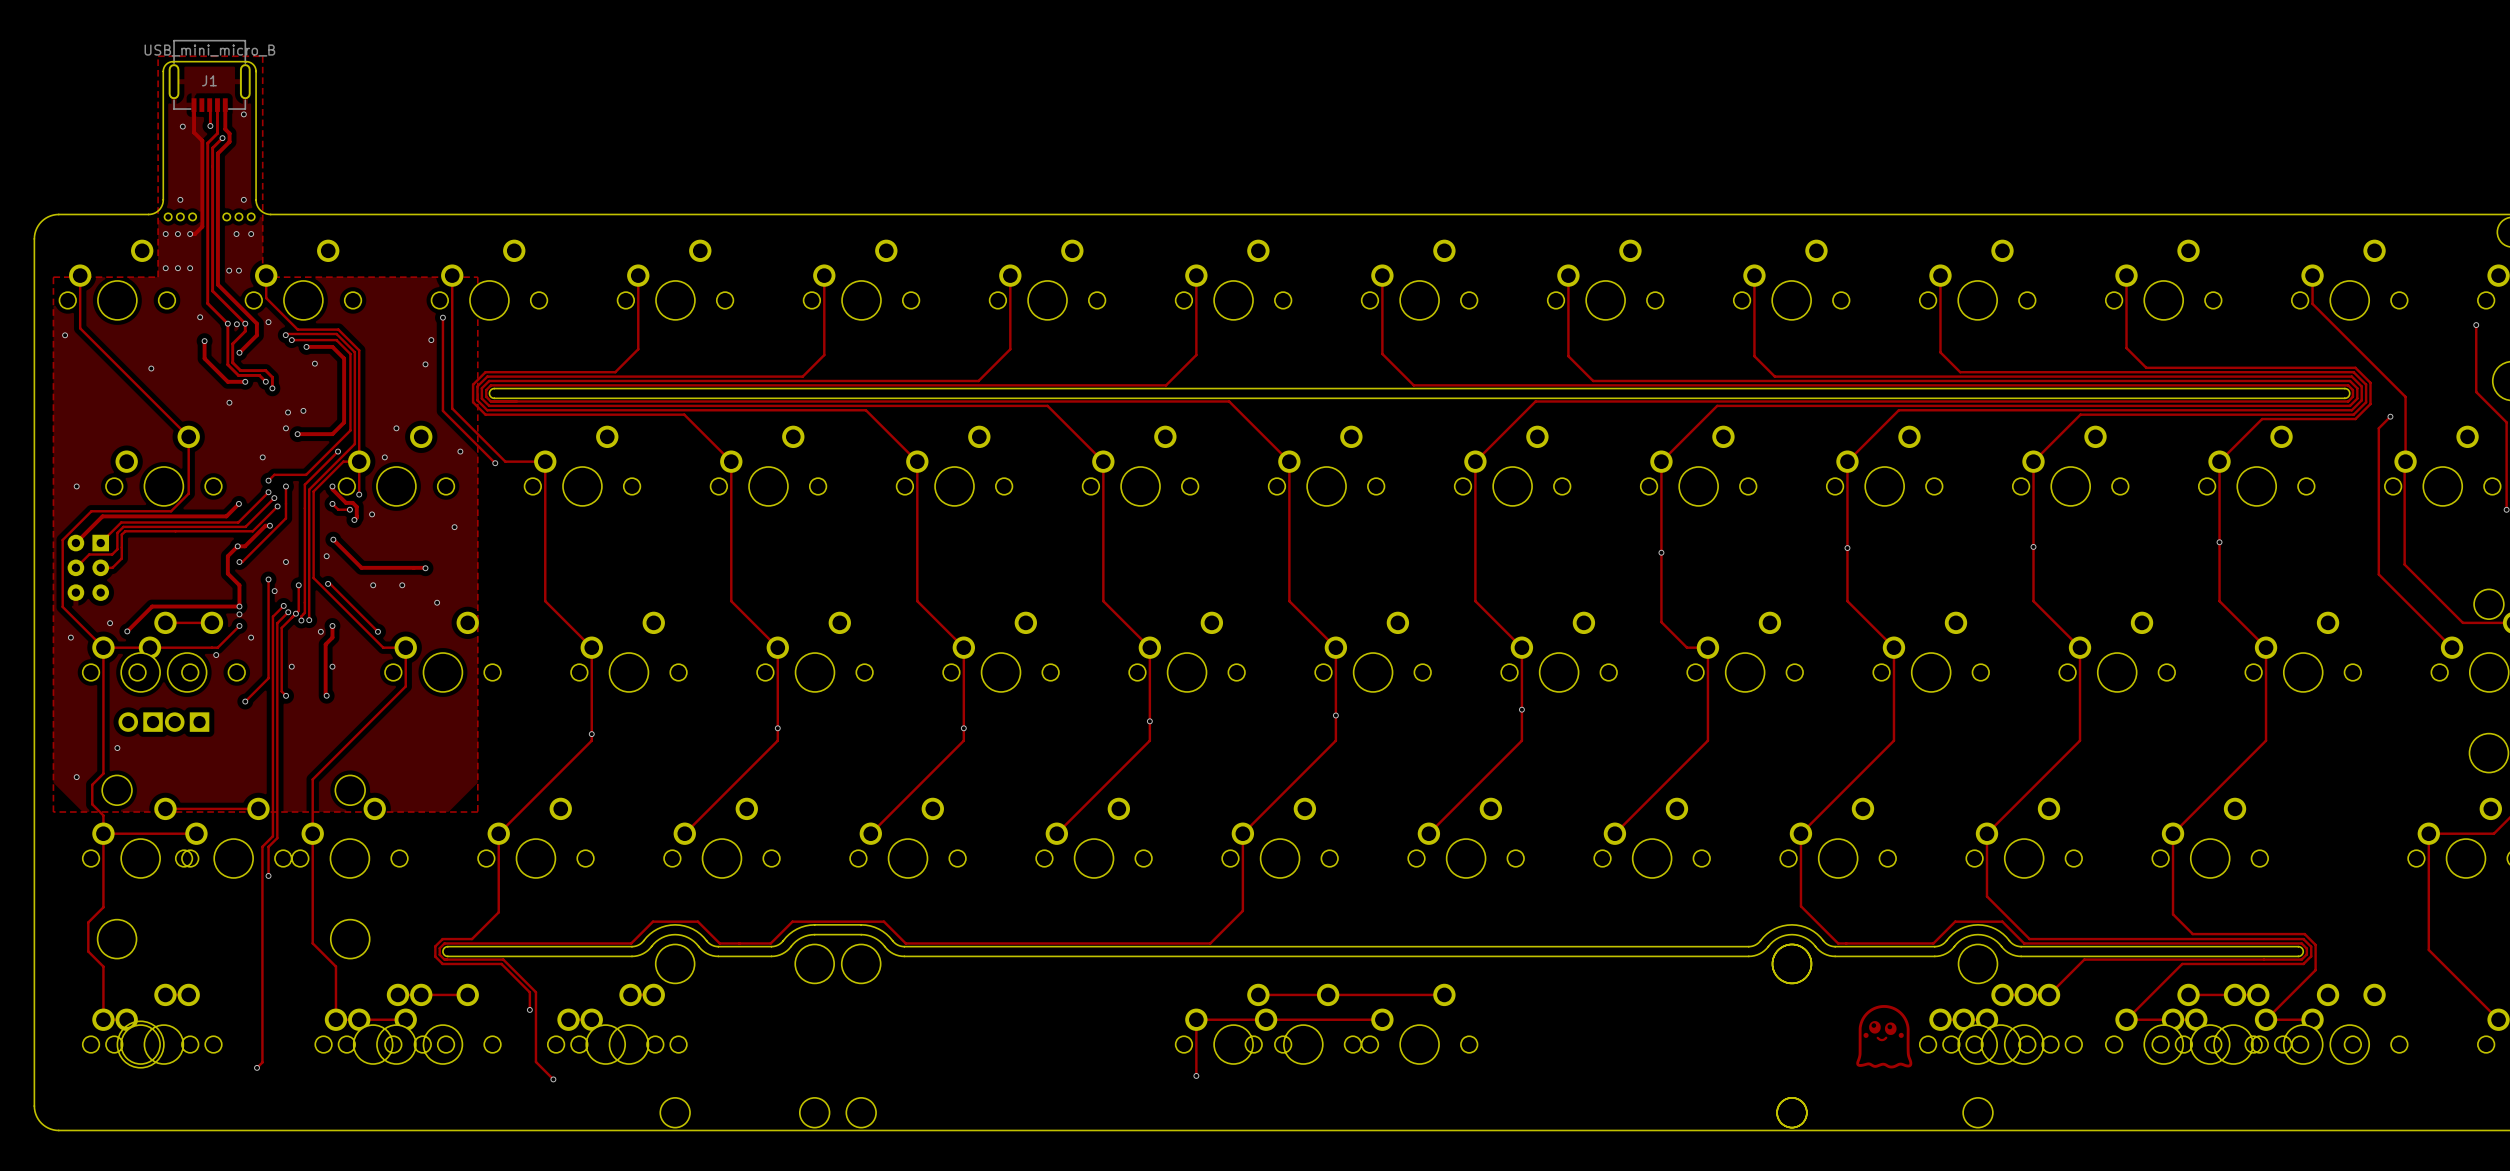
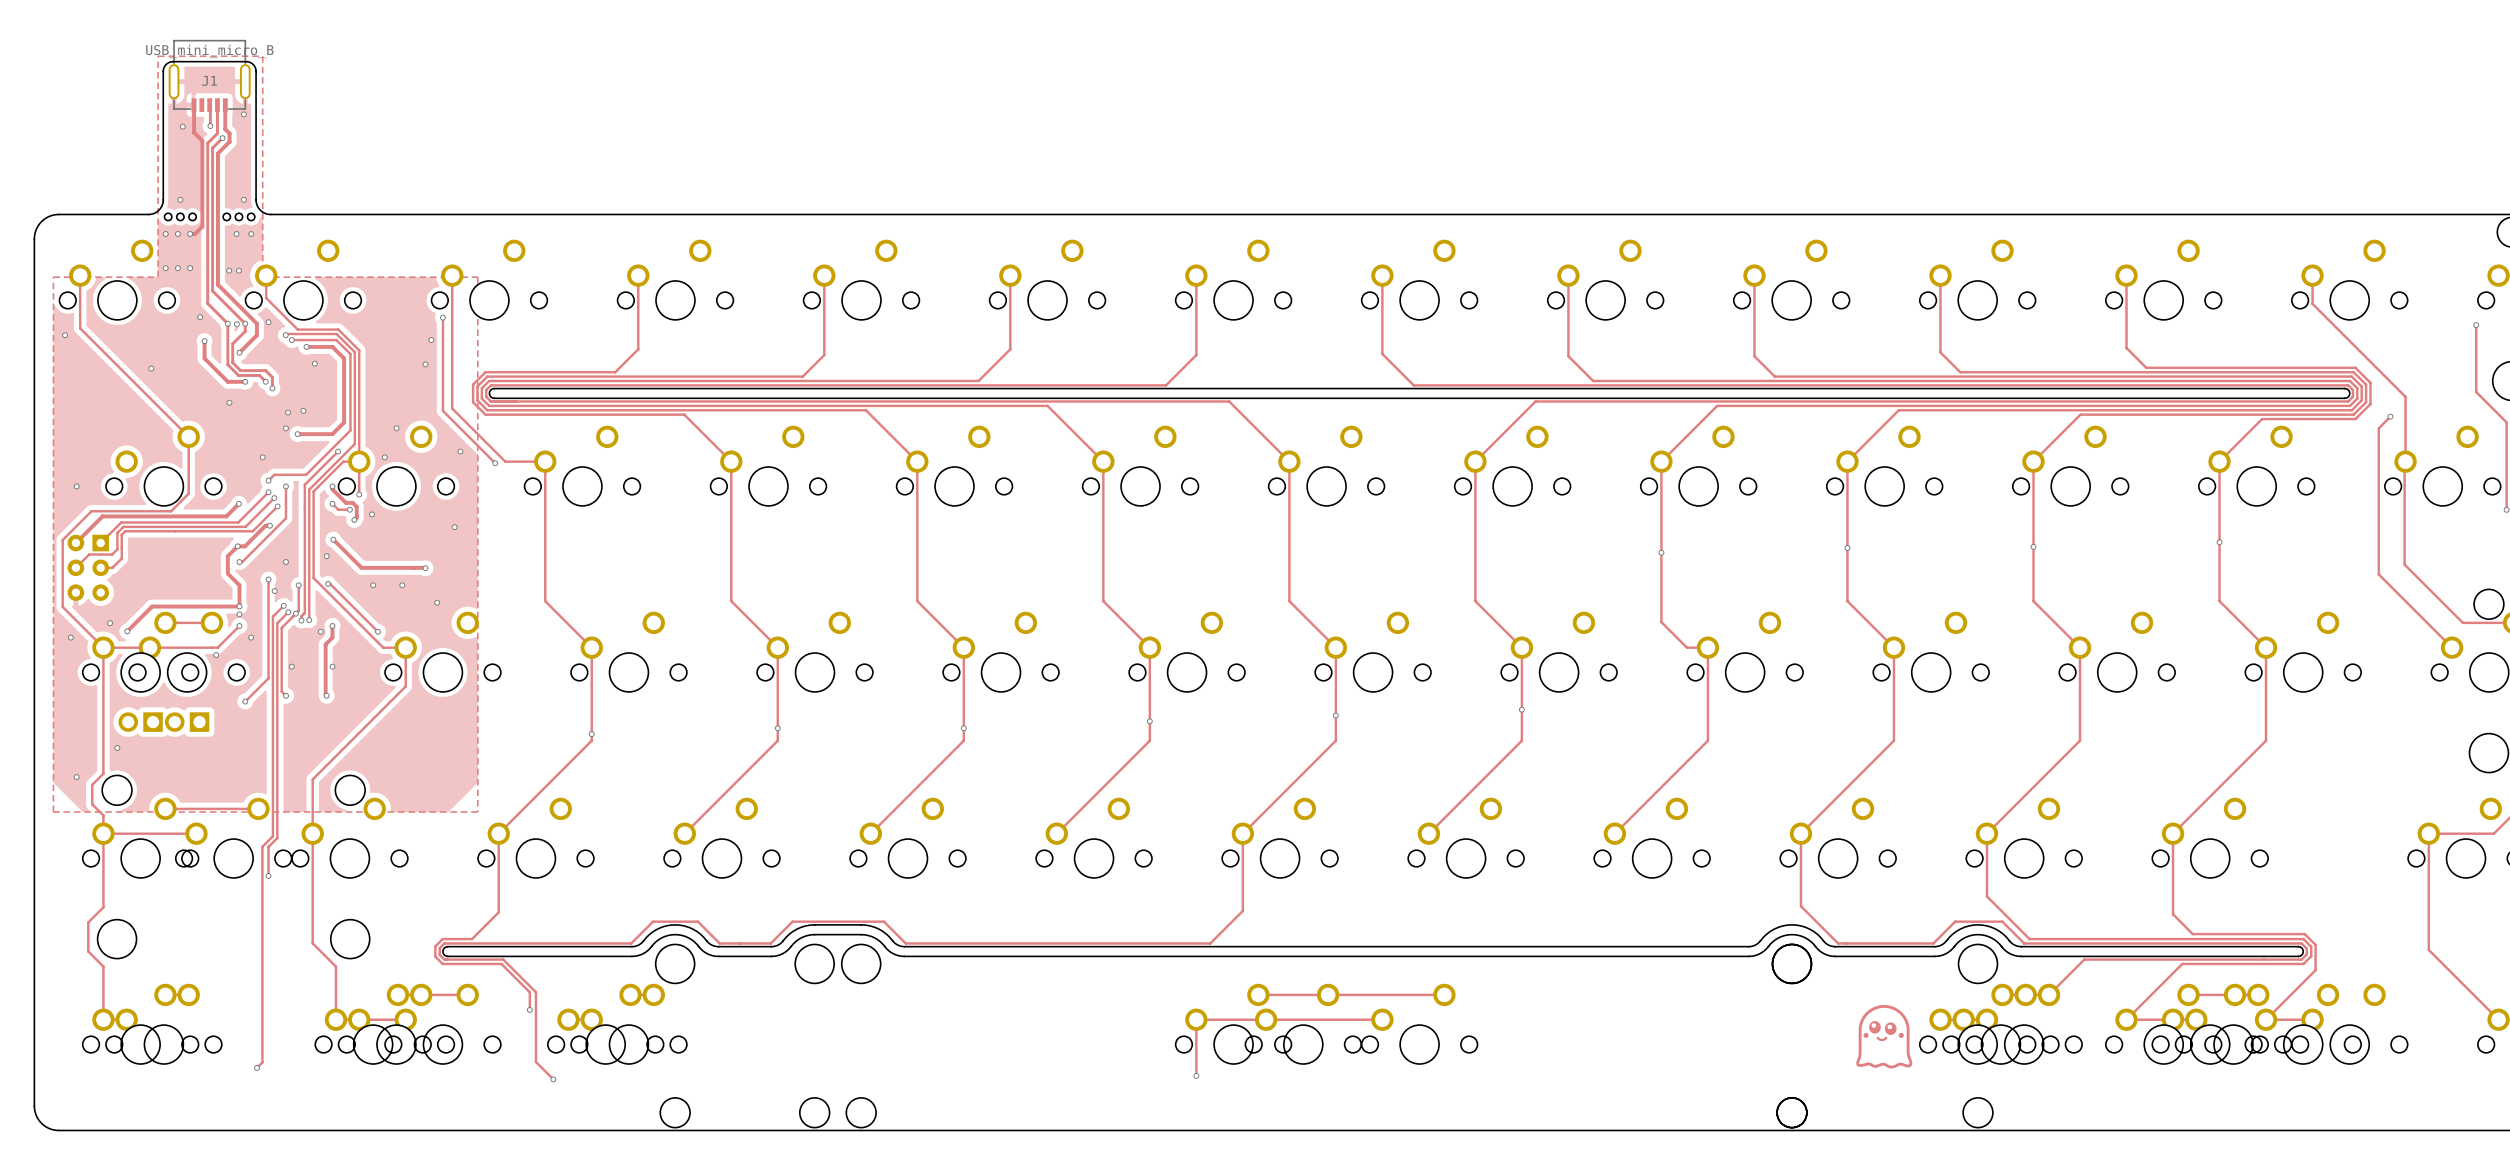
round board edge: [116, 1020, 165, 1069] -> none

